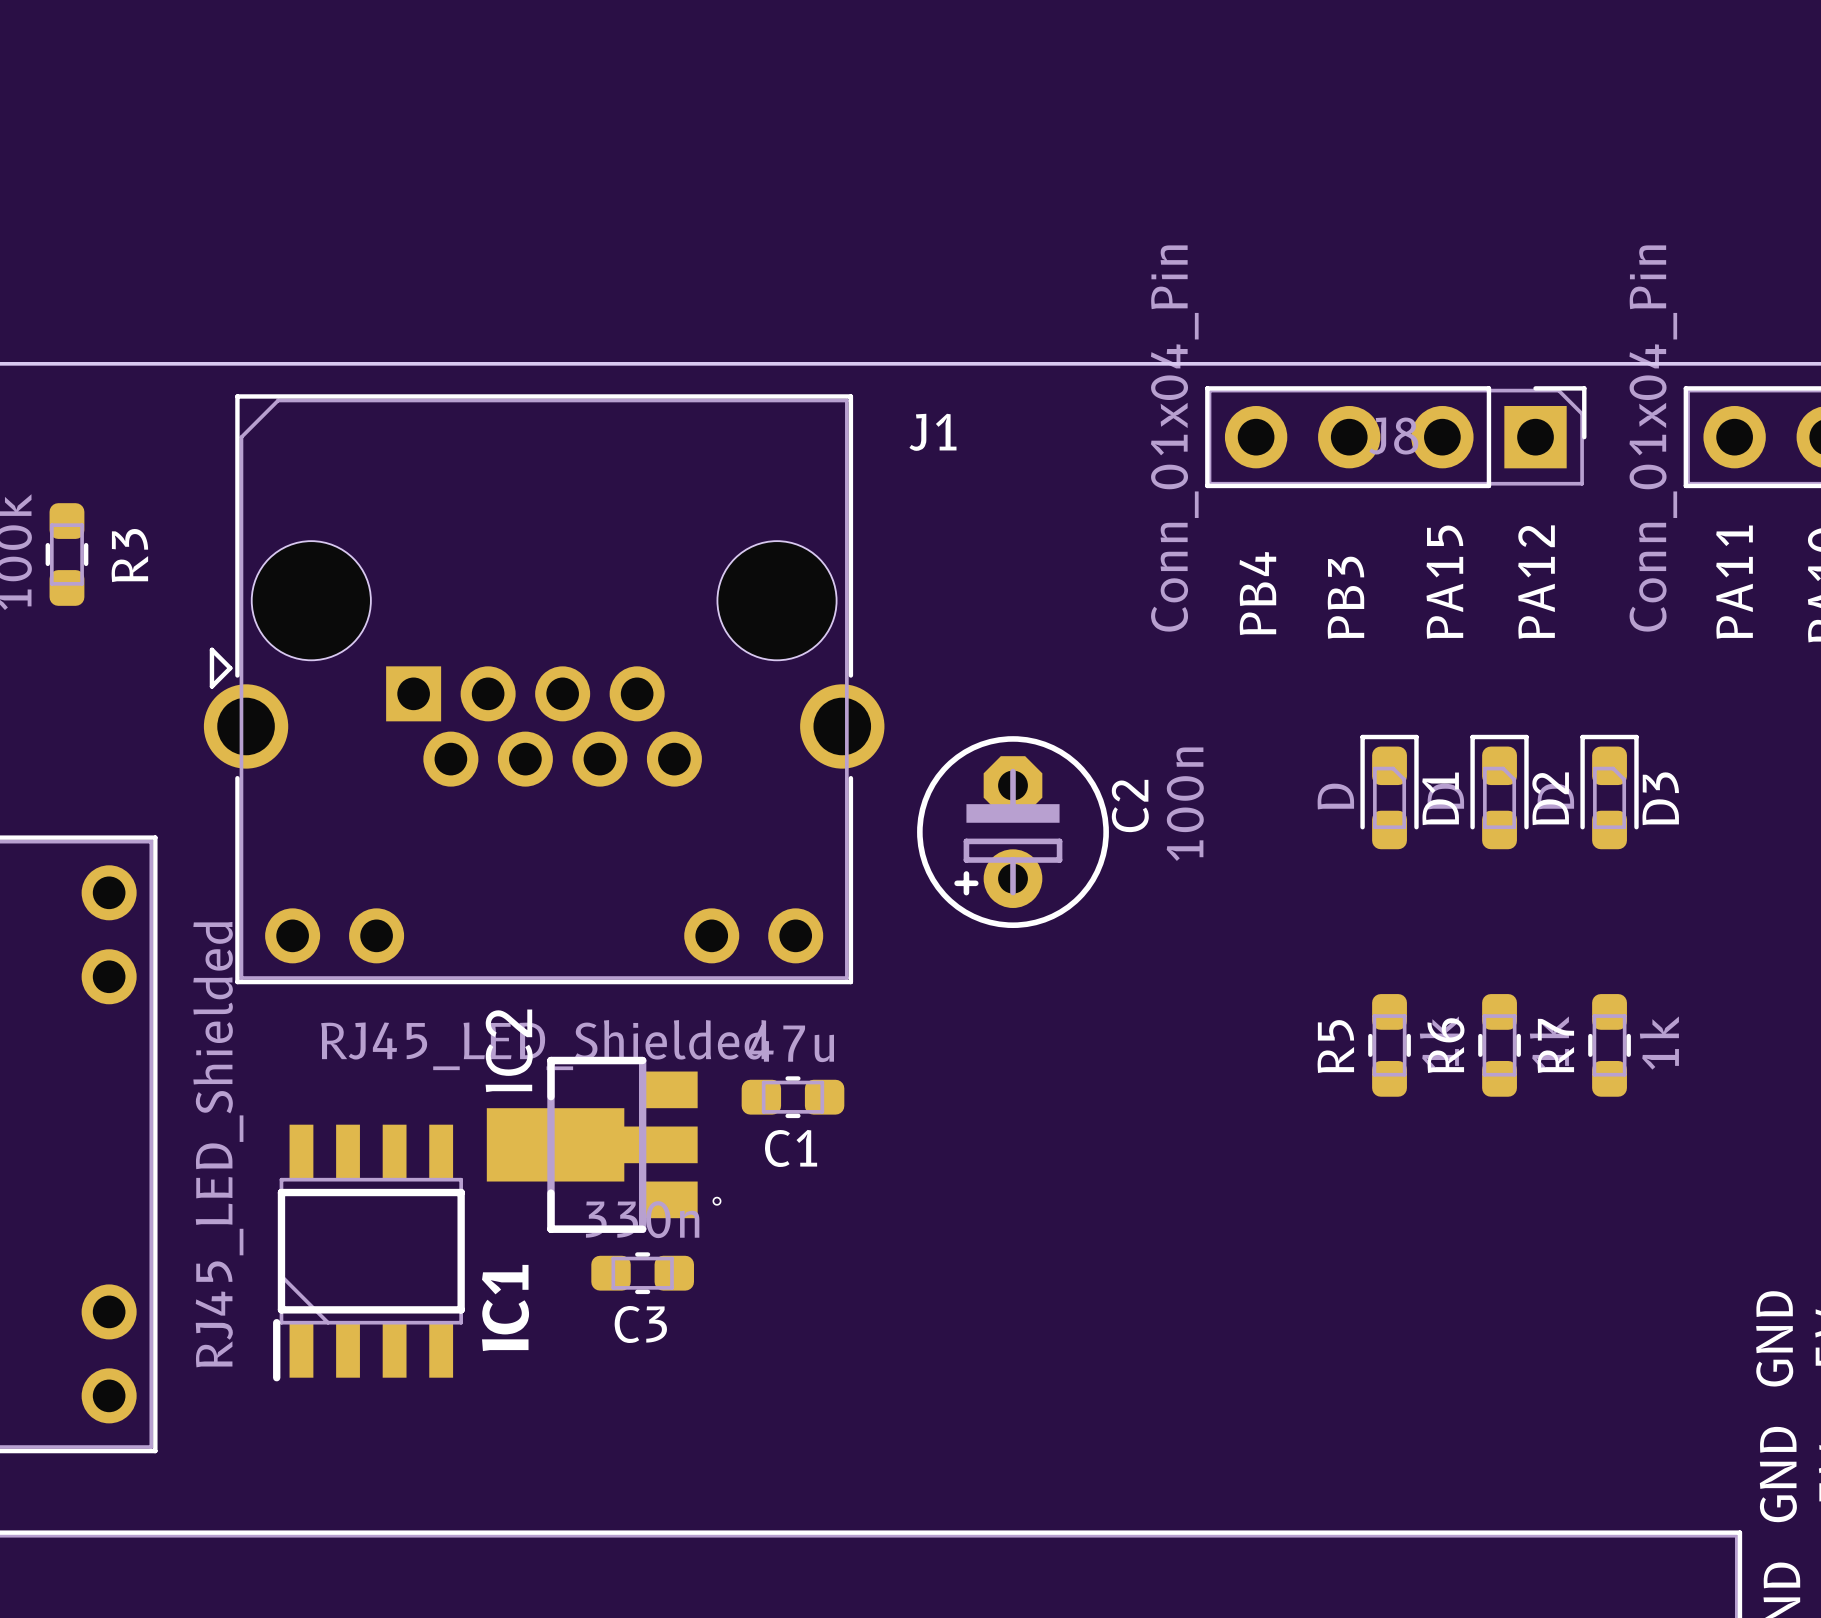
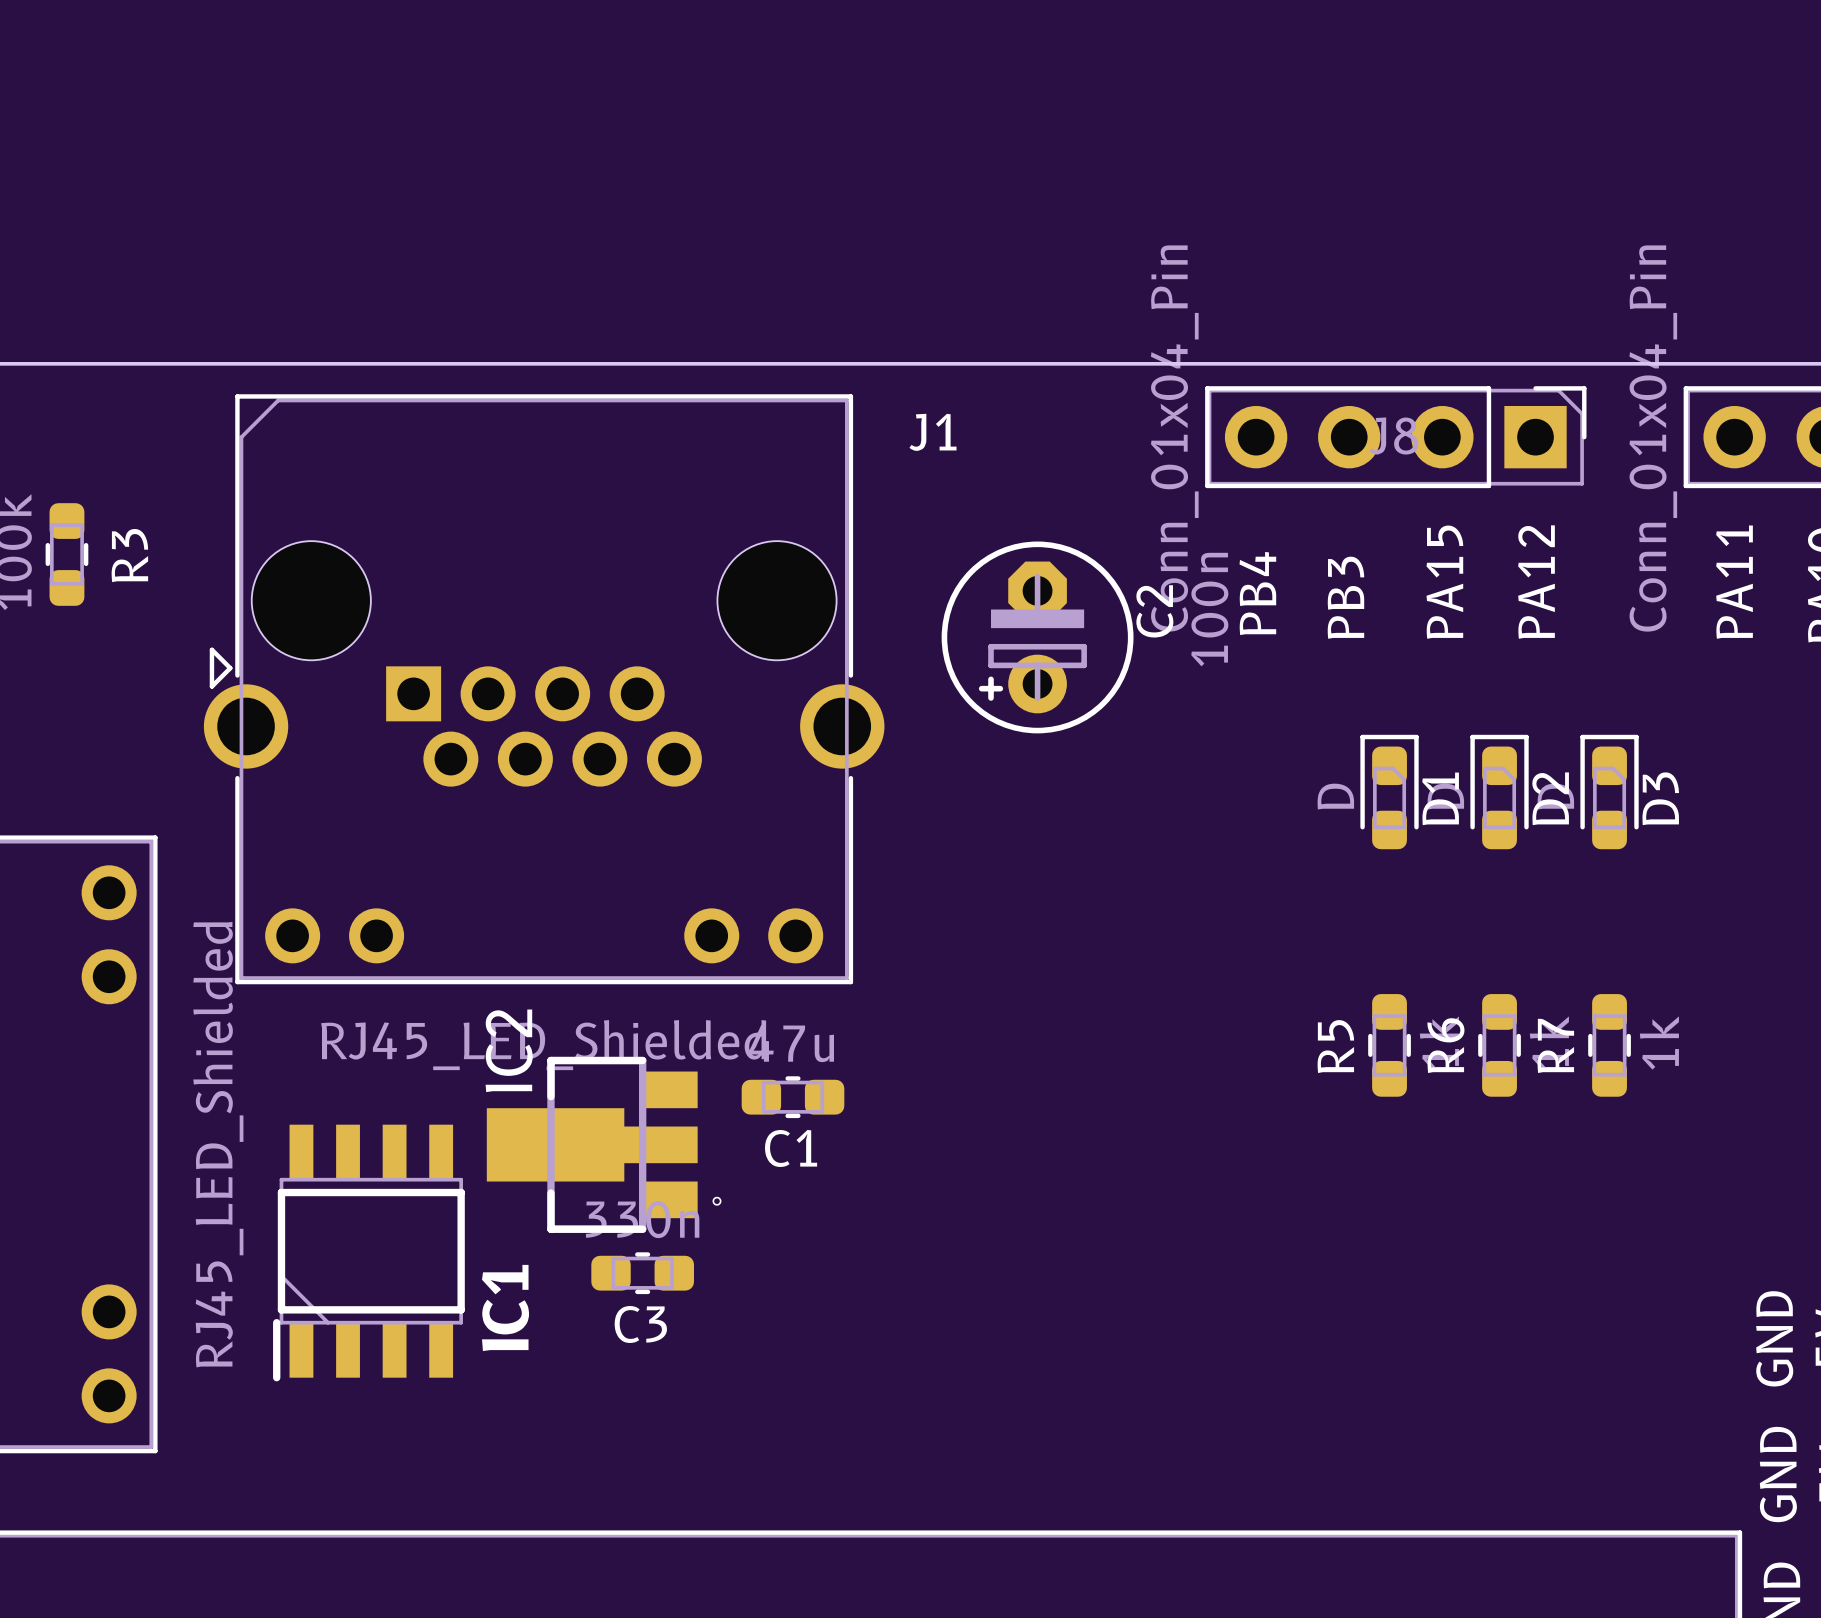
C2 position: (1013, 832) -> (1037, 637)

